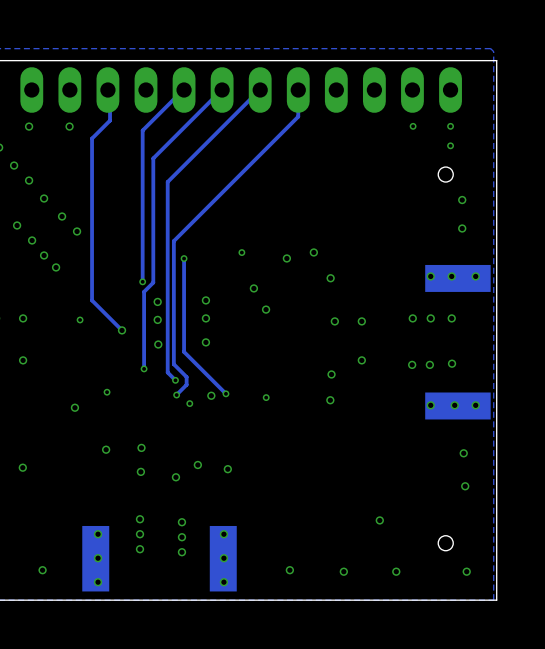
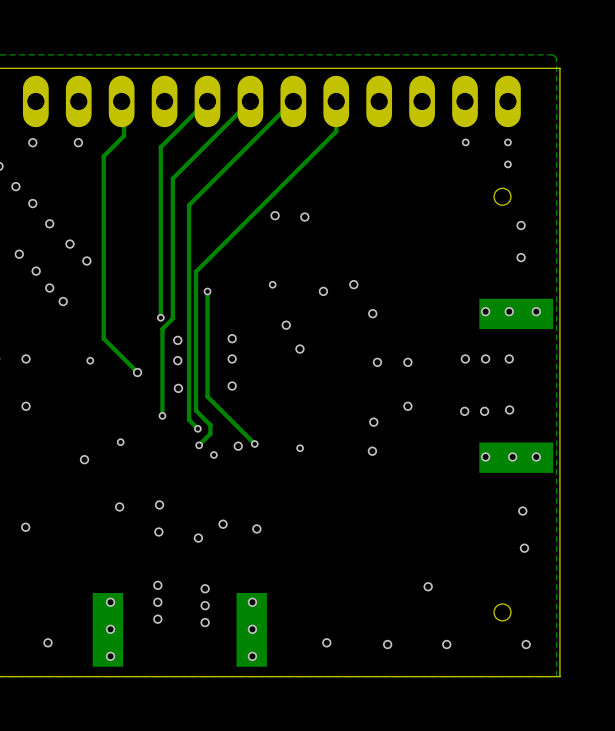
via: none -> (275, 215)
via: none -> (304, 217)

